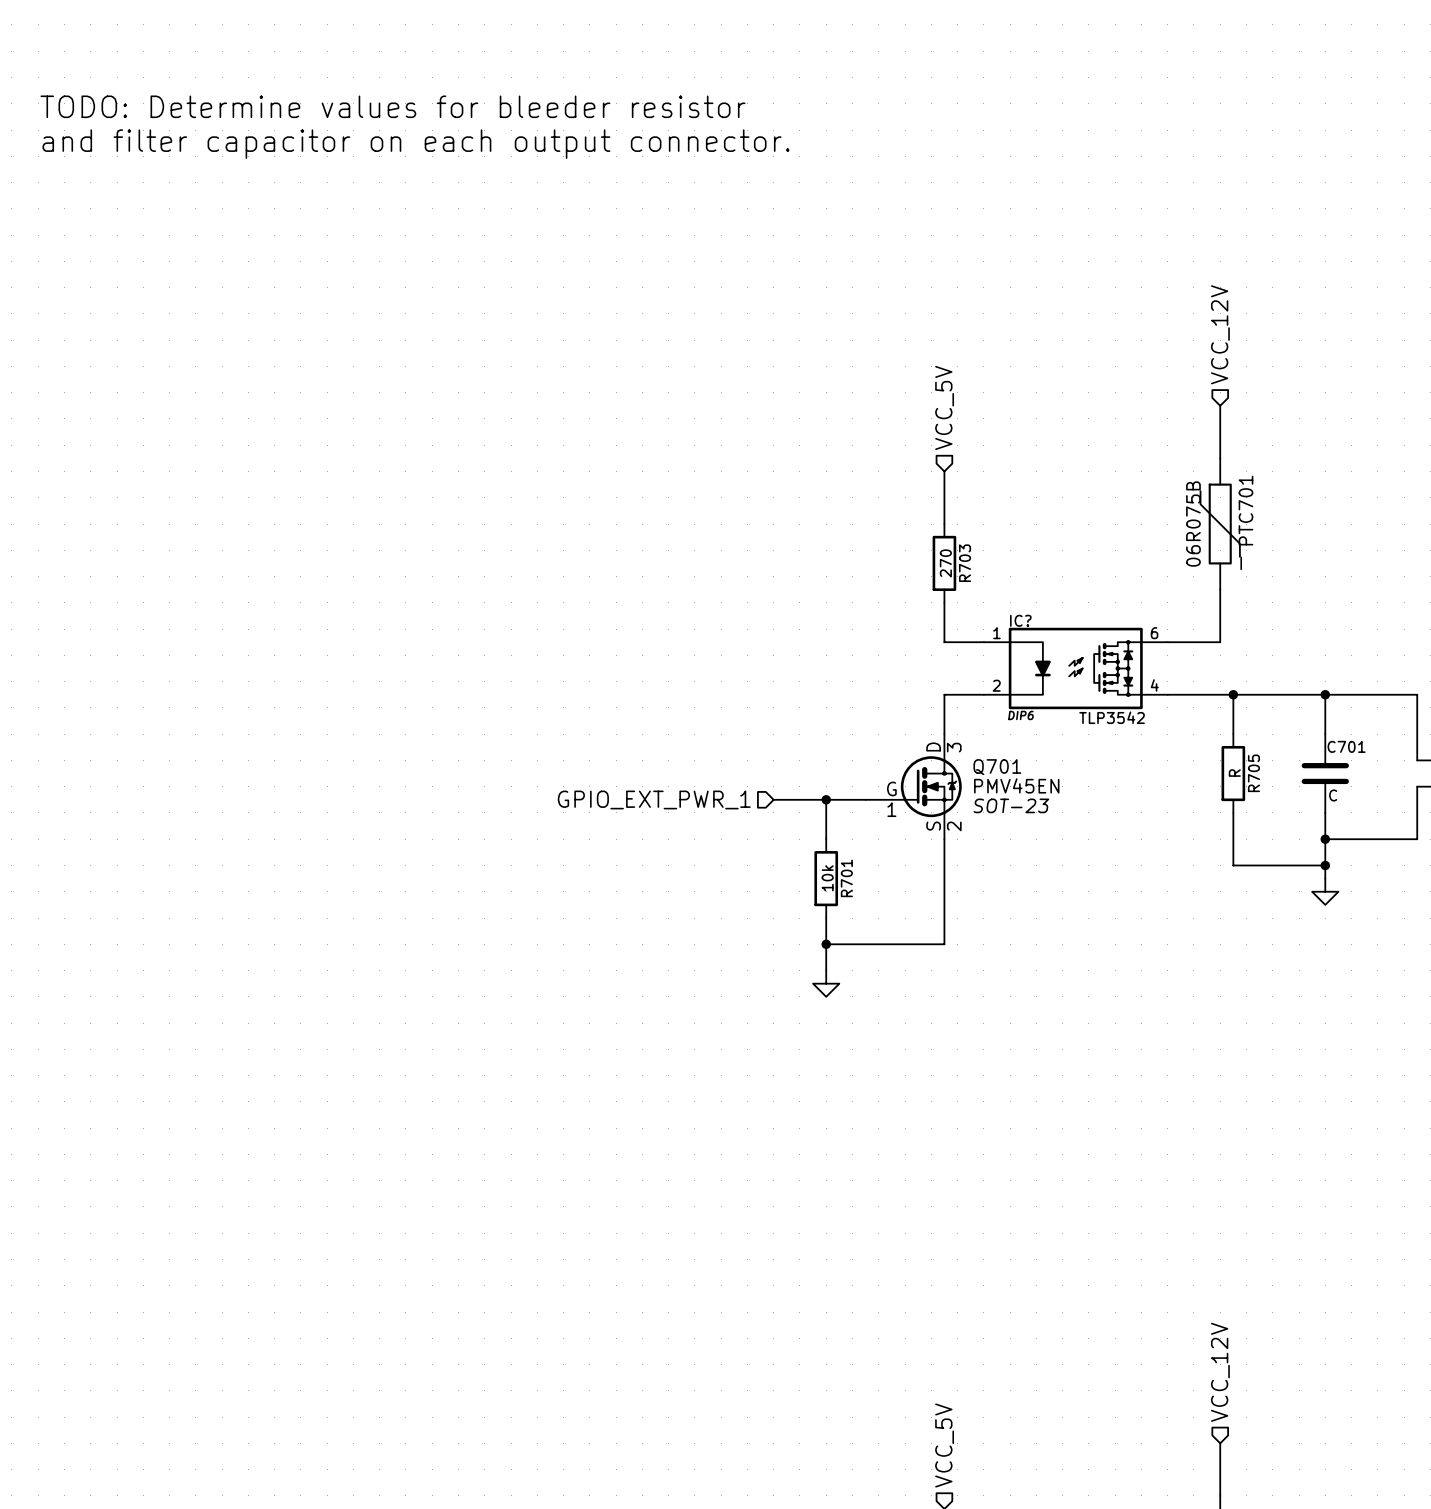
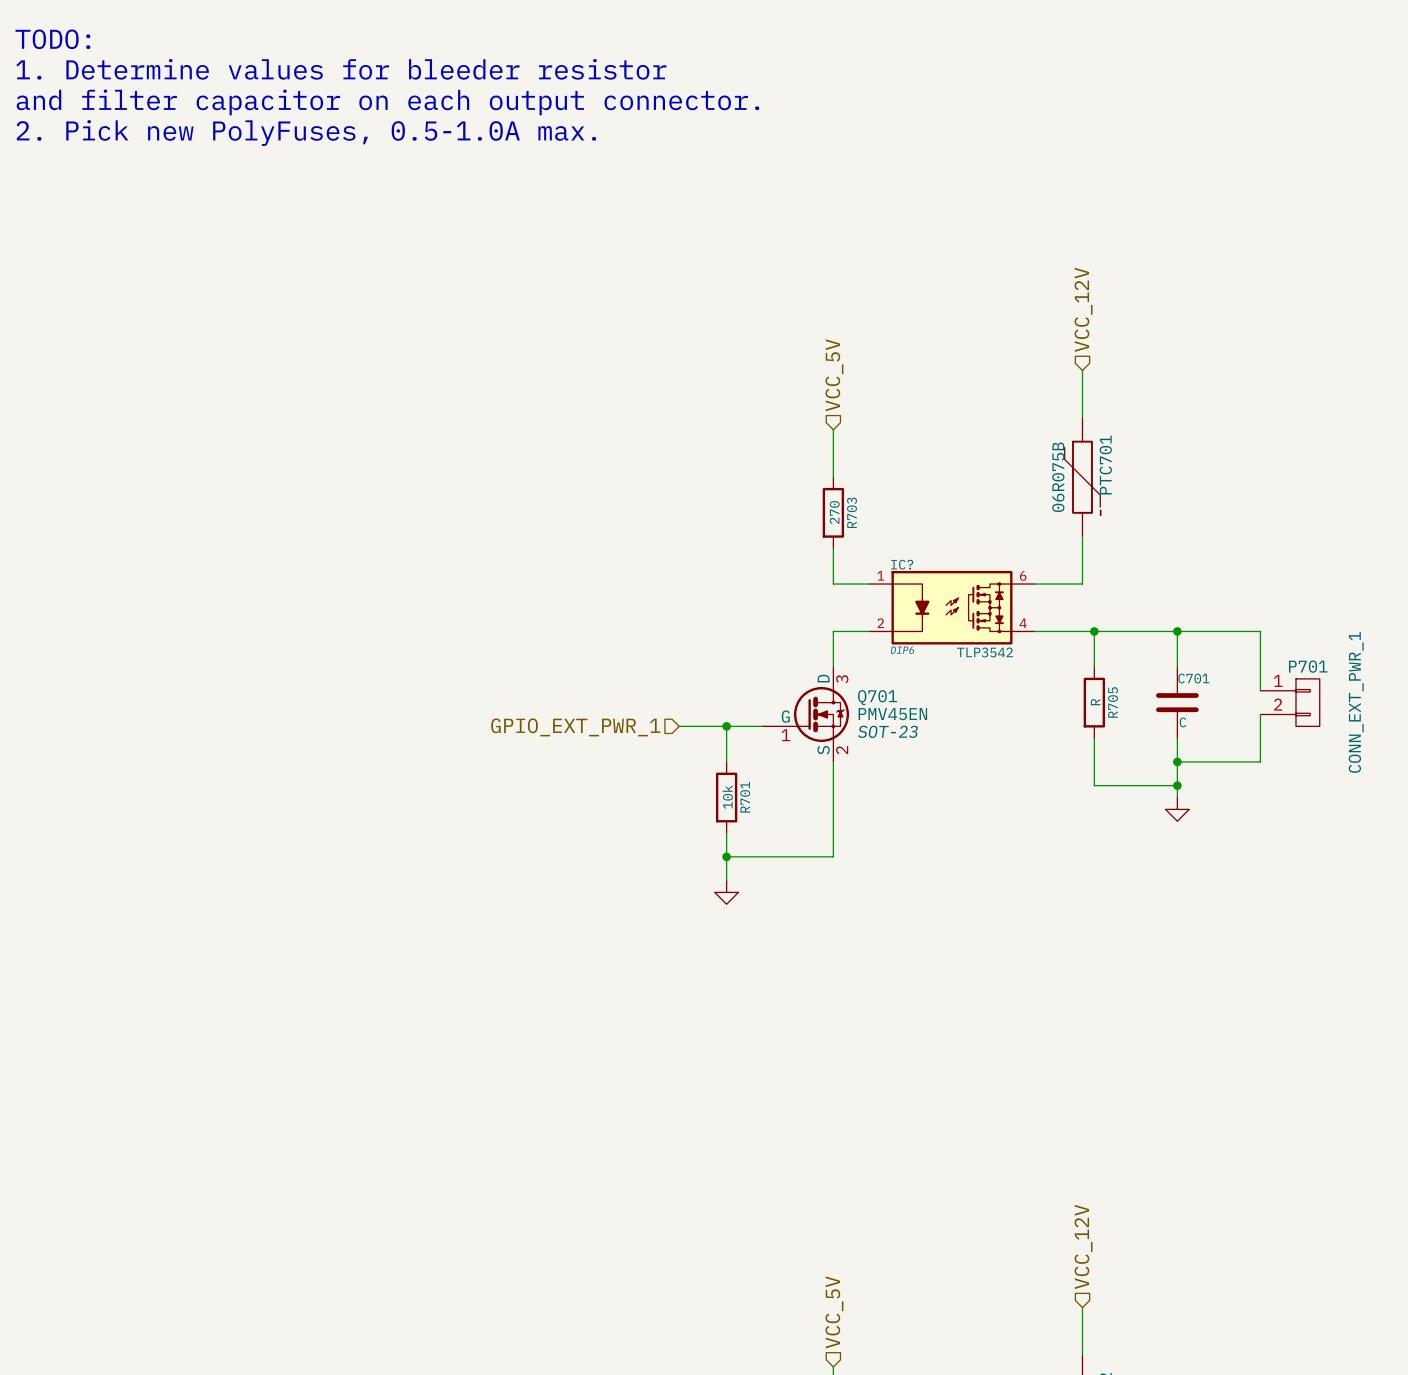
text: none -> TODO: (52, 39)
text: none -> 1. Determine values for bleeder resistor (341, 69)
text: TODO: Determine values for bleeder resistor (392, 106) -> and filter capacitor on each output connector. (387, 102)
text: and filter capacitor on each output connector. (416, 144) -> 2. Pick new PolyFuses, 0.5-1.0A max. (306, 133)

